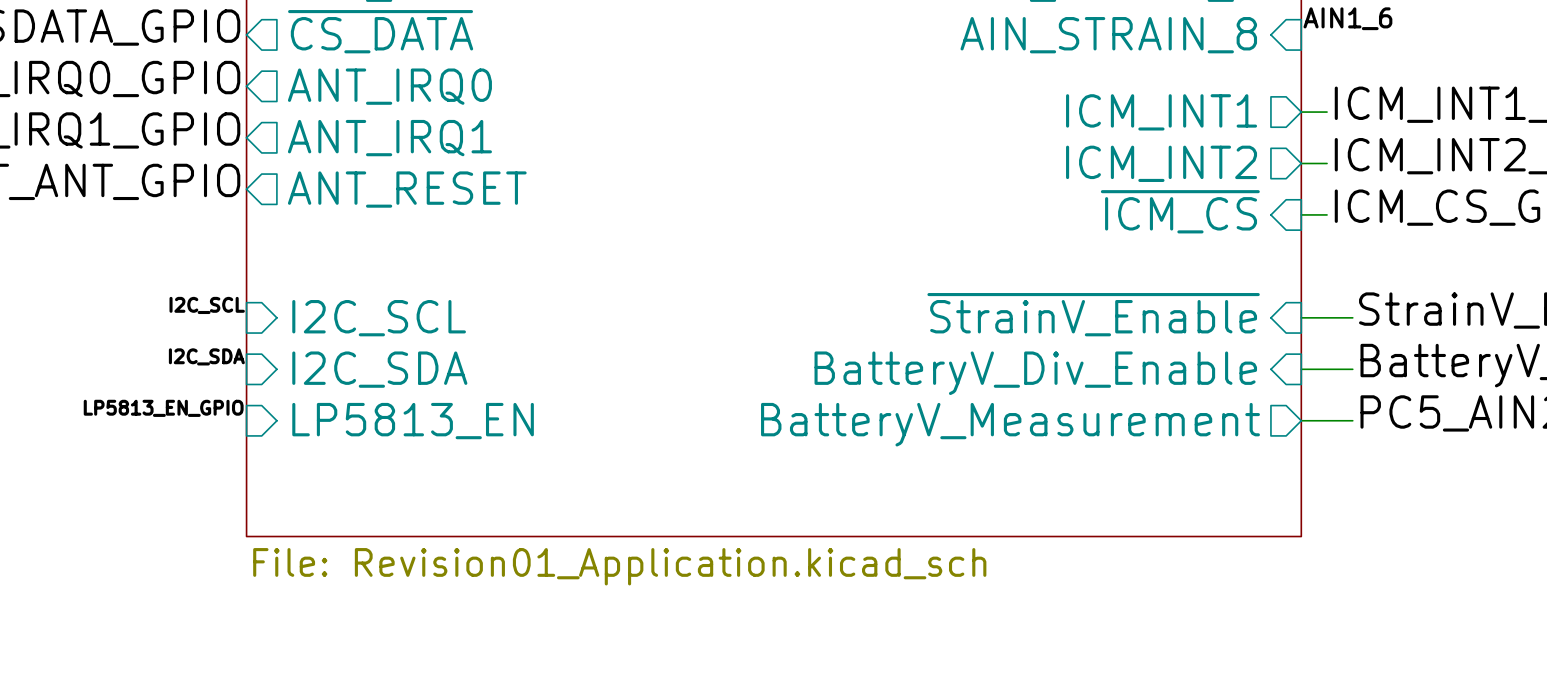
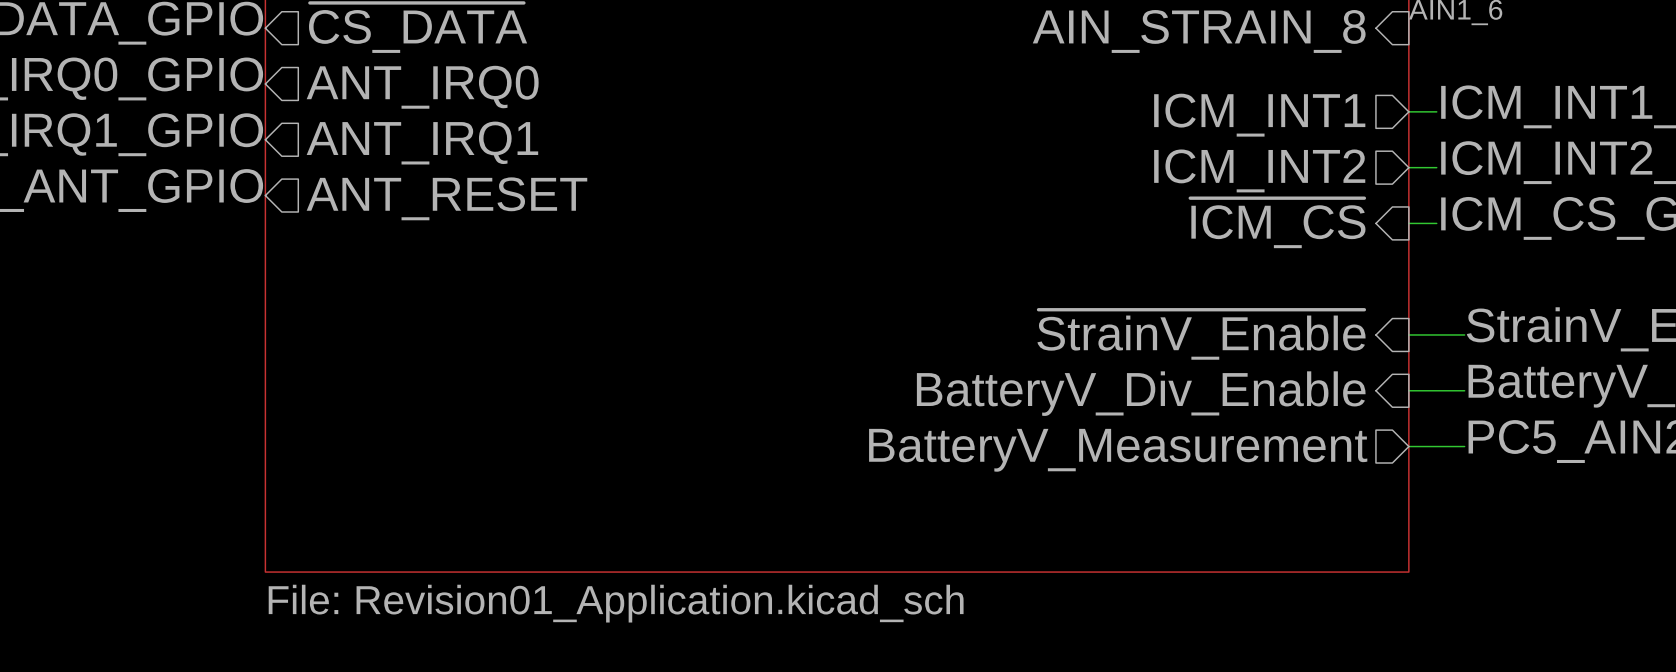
label: I2C_SCL (207, 305) -> none
sheet pin: I2C_SCL (379, 318) -> none
label: I2C_SDA (206, 356) -> none
sheet pin: I2C_SDA (379, 369) -> none
label: LP5813_EN_GPIO (163, 408) -> none
sheet pin: LP5813_EN (413, 421) -> none

